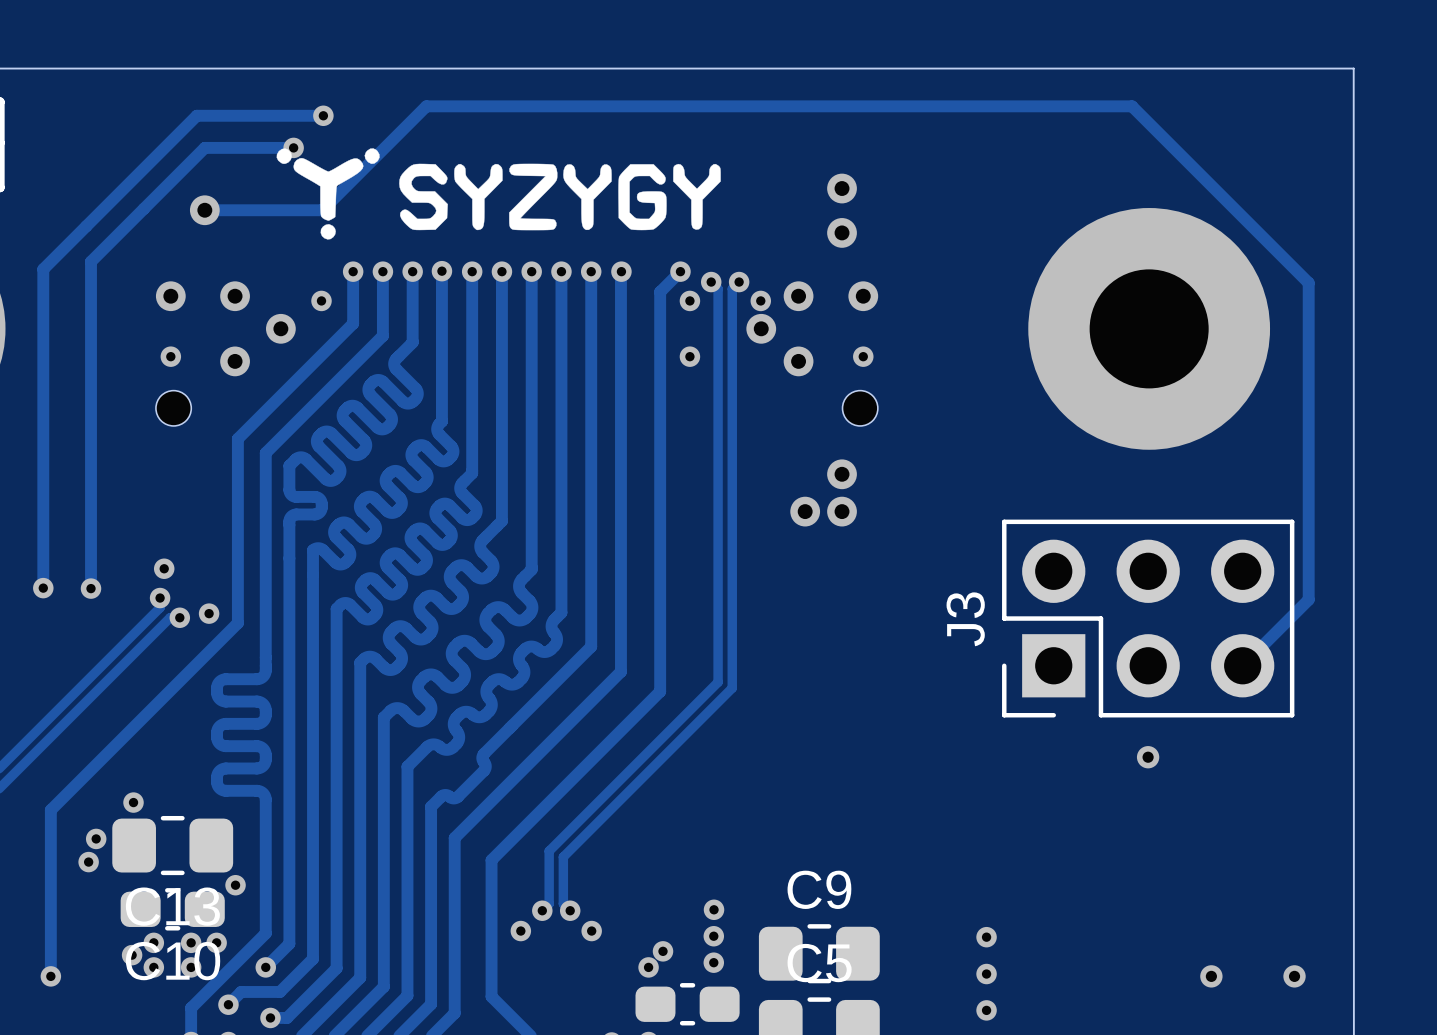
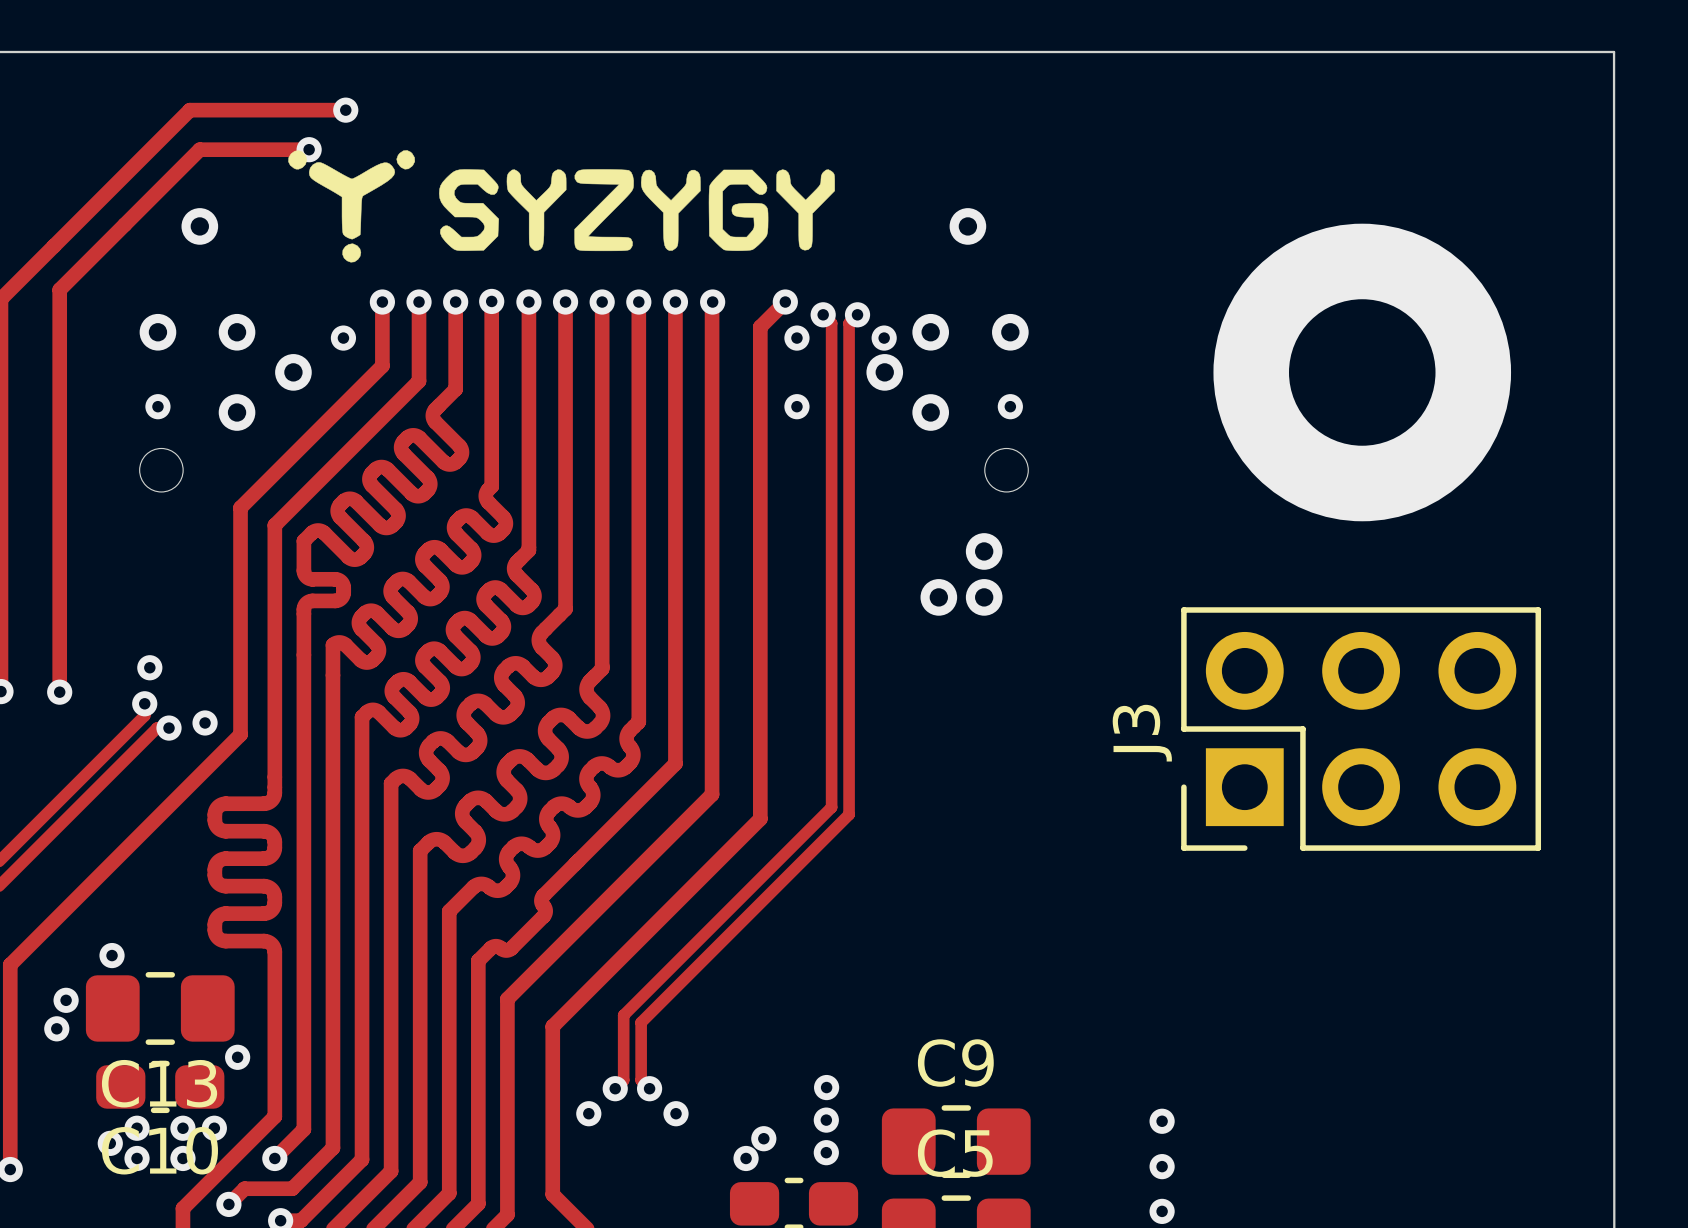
via: (842, 188) -> none
track: (204, 210) (322, 210) (426, 106) (1132, 106) (1308, 282) (1308, 599) (1242, 665) -> none
via: none -> (967, 226)
via: (842, 232) -> none
via: (1148, 757) -> none
via: (1211, 976) -> none
via: (1294, 976) -> none

